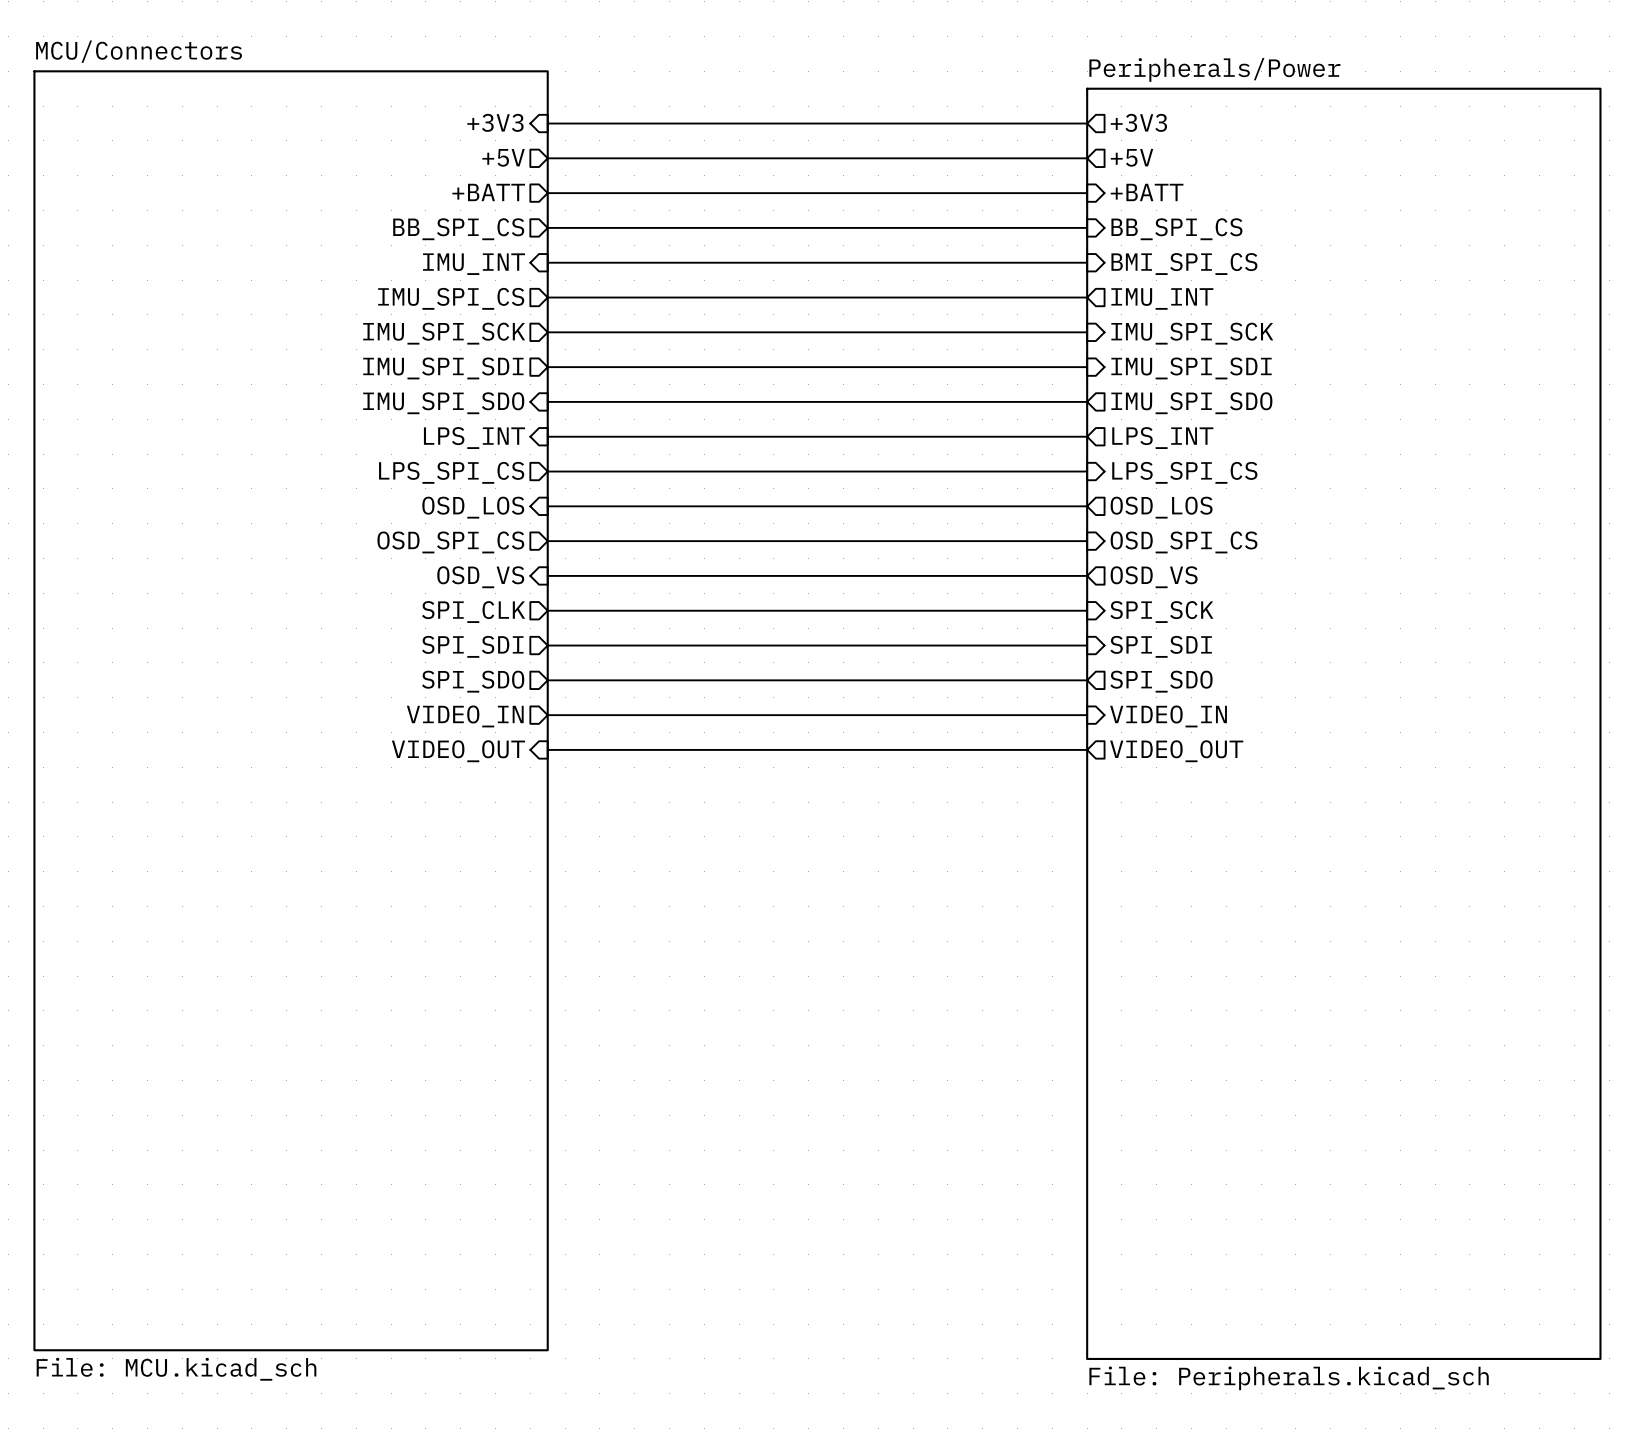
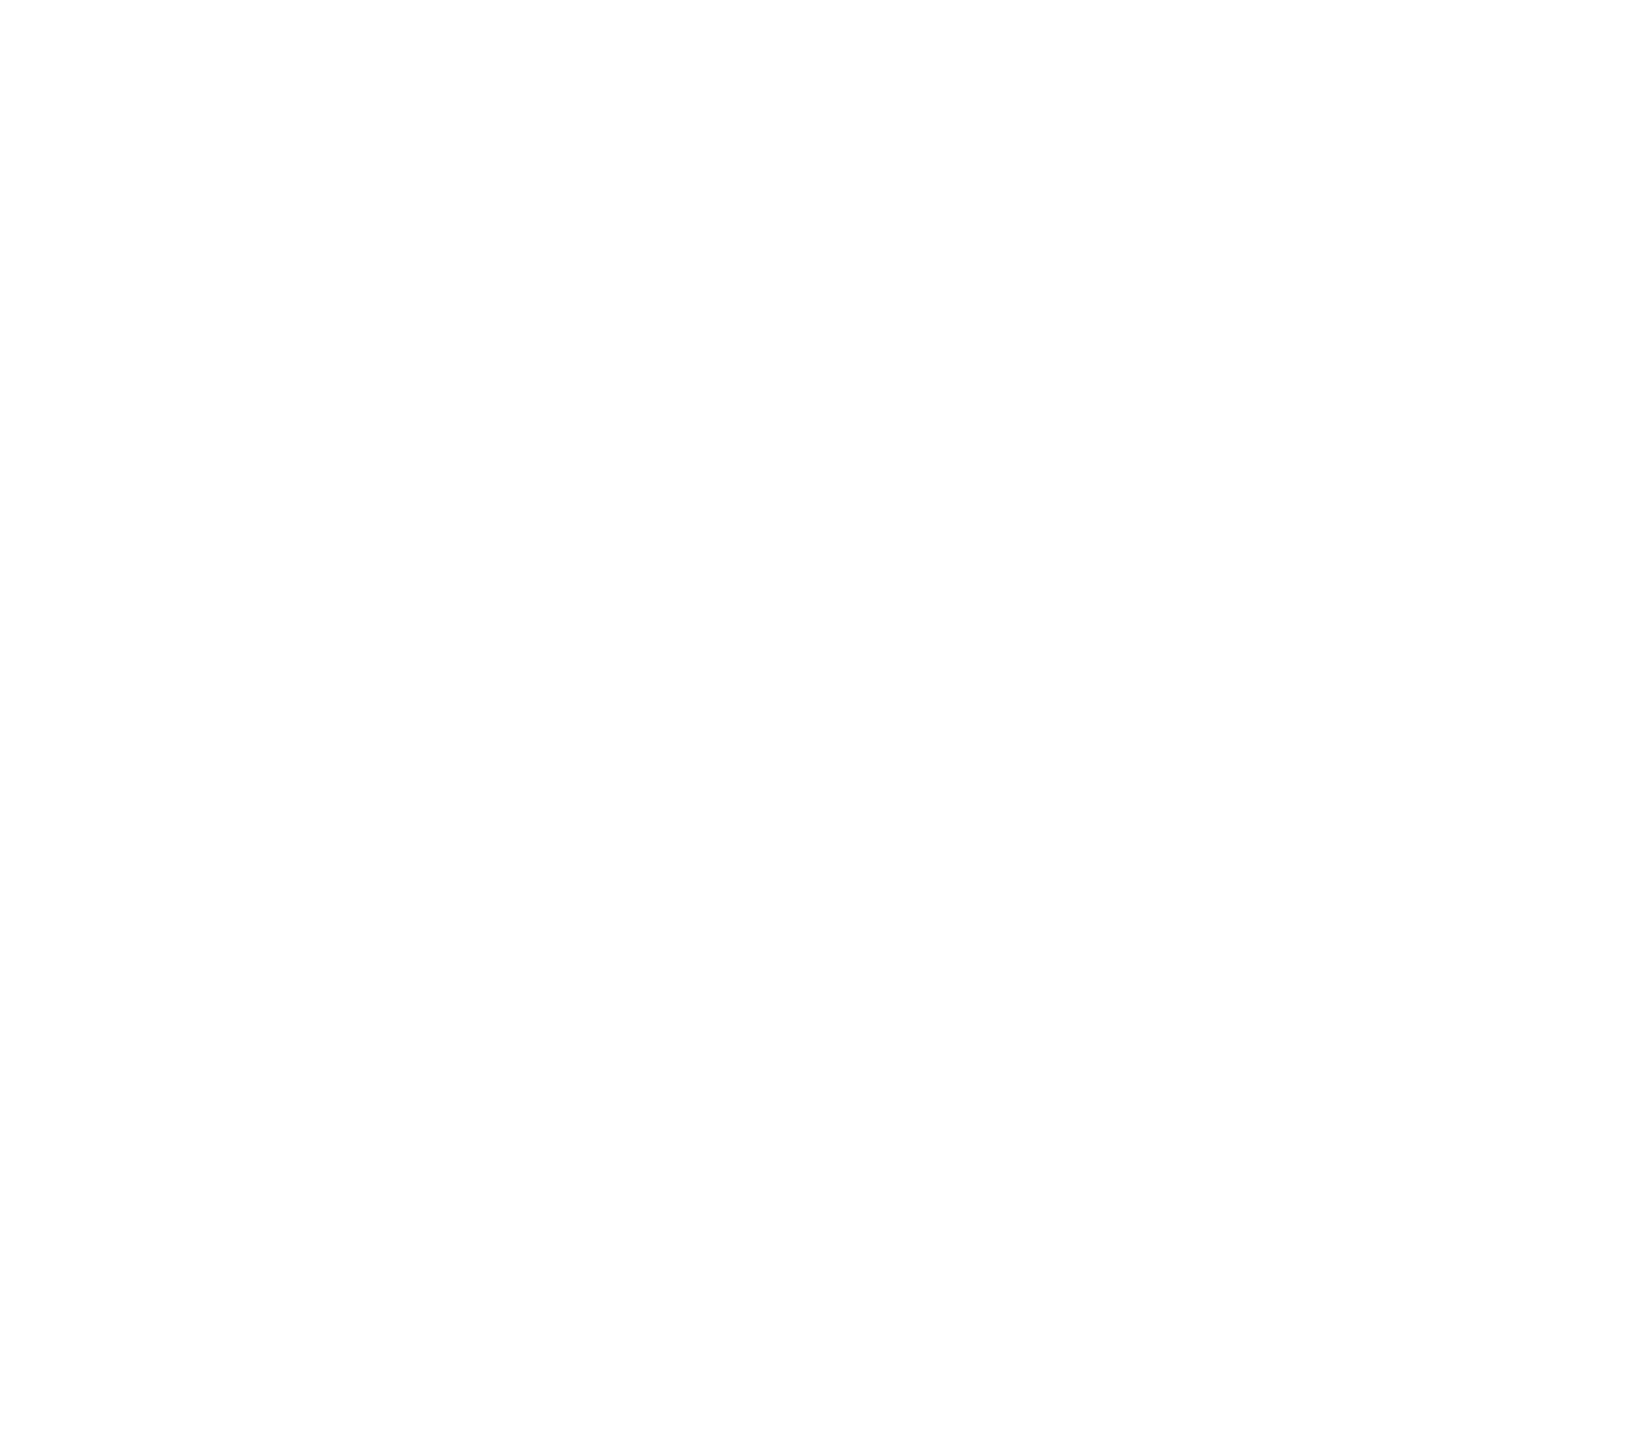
sheet pin: +3V3 (495, 122) -> none
sheet pin: +3V3 (1138, 122) -> none
wire: (547, 123) (1087, 123) -> none
sheet pin: +5V (503, 157) -> none
sheet pin: +5V (1132, 157) -> none
wire: (547, 158) (1087, 158) -> none
sheet pin: +BATT (488, 192) -> none
sheet pin: +BATT (1147, 192) -> none
wire: (547, 193) (1087, 193) -> none
wire: (547, 227) (1087, 227) -> none
sheet pin: BB_SPI_CS (458, 229) -> none
sheet pin: BB_SPI_CS (1176, 229) -> none
wire: (547, 262) (1087, 262) -> none
sheet pin: IMU_INT (474, 264) -> none
sheet pin: BMI_SPI_CS (1184, 264) -> none
wire: (547, 297) (1087, 297) -> none
sheet pin: IMU_SPI_CS (451, 298) -> none
sheet pin: IMU_INT (1162, 298) -> none
wire: (547, 332) (1087, 332) -> none
sheet pin: IMU_SPI_SCK (444, 333) -> none
sheet pin: IMU_SPI_SCK (1192, 333) -> none
wire: (547, 367) (1087, 367) -> none
sheet pin: IMU_SPI_SDI (443, 368) -> none
sheet pin: IMU_SPI_SDI (1191, 368) -> none
wire: (547, 401) (1087, 401) -> none
sheet pin: IMU_SPI_SDO (443, 403) -> none
sheet pin: IMU_SPI_SDO (1191, 403) -> none
wire: (547, 436) (1087, 436) -> none
sheet pin: LPS_INT (474, 438) -> none
sheet pin: LPS_INT (1162, 438) -> none
wire: (547, 471) (1087, 471) -> none
sheet pin: LPS_SPI_CS (451, 472) -> none
sheet pin: LPS_SPI_CS (1184, 472) -> none
wire: (547, 506) (1087, 506) -> none
sheet pin: OSD_LOS (473, 507) -> none
sheet pin: OSD_LOS (1161, 507) -> none
wire: (547, 541) (1087, 541) -> none
sheet pin: OSD_SPI_CS (450, 542) -> none
sheet pin: OSD_SPI_CS (1184, 542) -> none
wire: (547, 575) (1087, 575) -> none
sheet pin: OSD_VS (480, 577) -> none
sheet pin: OSD_VS (1154, 577) -> none
wire: (547, 610) (1087, 610) -> none
sheet pin: SPI_CLK (473, 612) -> none
sheet pin: SPI_SCK (1161, 612) -> none
wire: (547, 645) (1087, 645) -> none
sheet pin: SPI_SDI (472, 646) -> none
sheet pin: SPI_SDI (1161, 646) -> none
wire: (547, 680) (1087, 680) -> none
sheet pin: SPI_SDO (473, 681) -> none
sheet pin: SPI_SDO (1161, 681) -> none
sheet MCU/Connectors: File: MCU.kicad_sch (291, 710) -> none
wire: (547, 715) (1087, 715) -> none
sheet pin: VIDEO_IN (465, 716) -> none
sheet pin: VIDEO_IN (1168, 716) -> none
sheet Peripherals/Power: File: Peripherals.kicad_sch (1343, 723) -> none
wire: (547, 749) (1087, 749) -> none
sheet pin: VIDEO_OUT (458, 751) -> none
sheet pin: VIDEO_OUT (1176, 751) -> none

